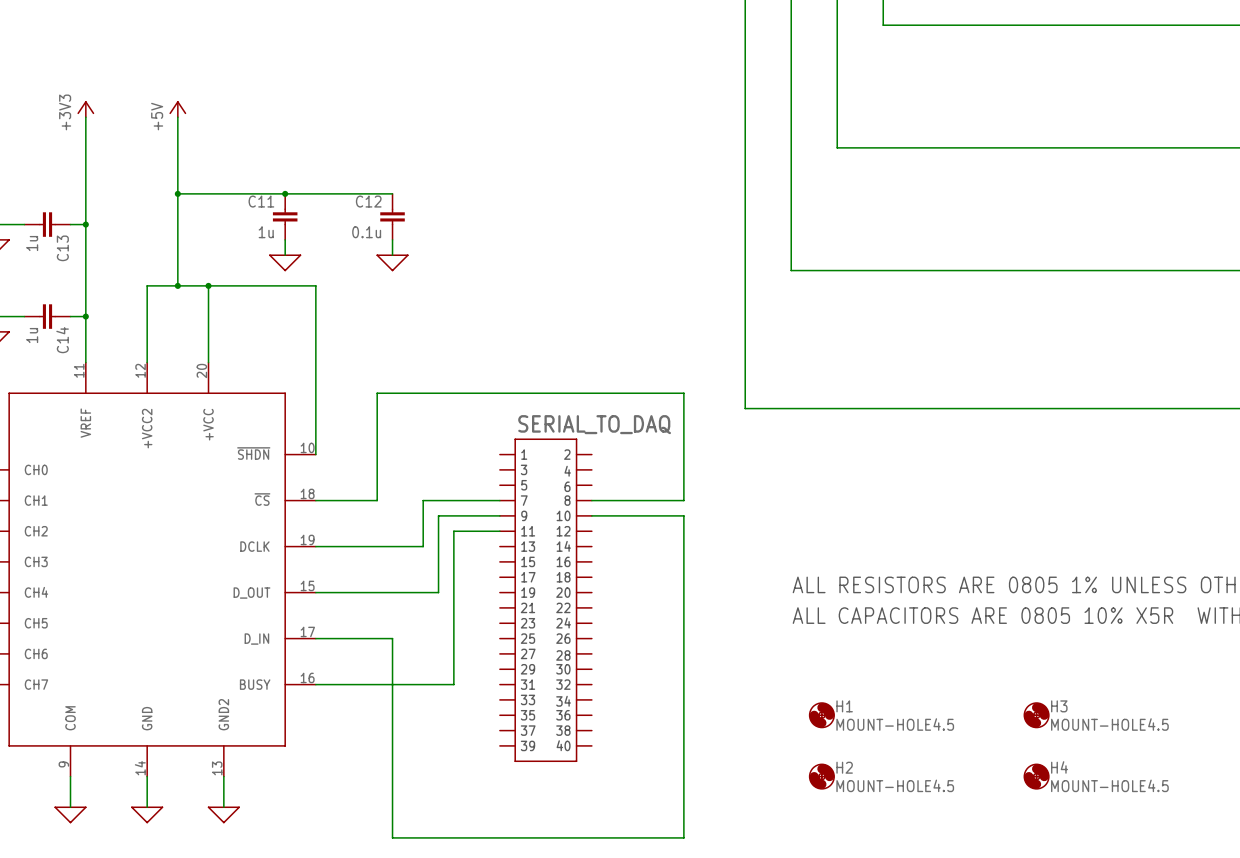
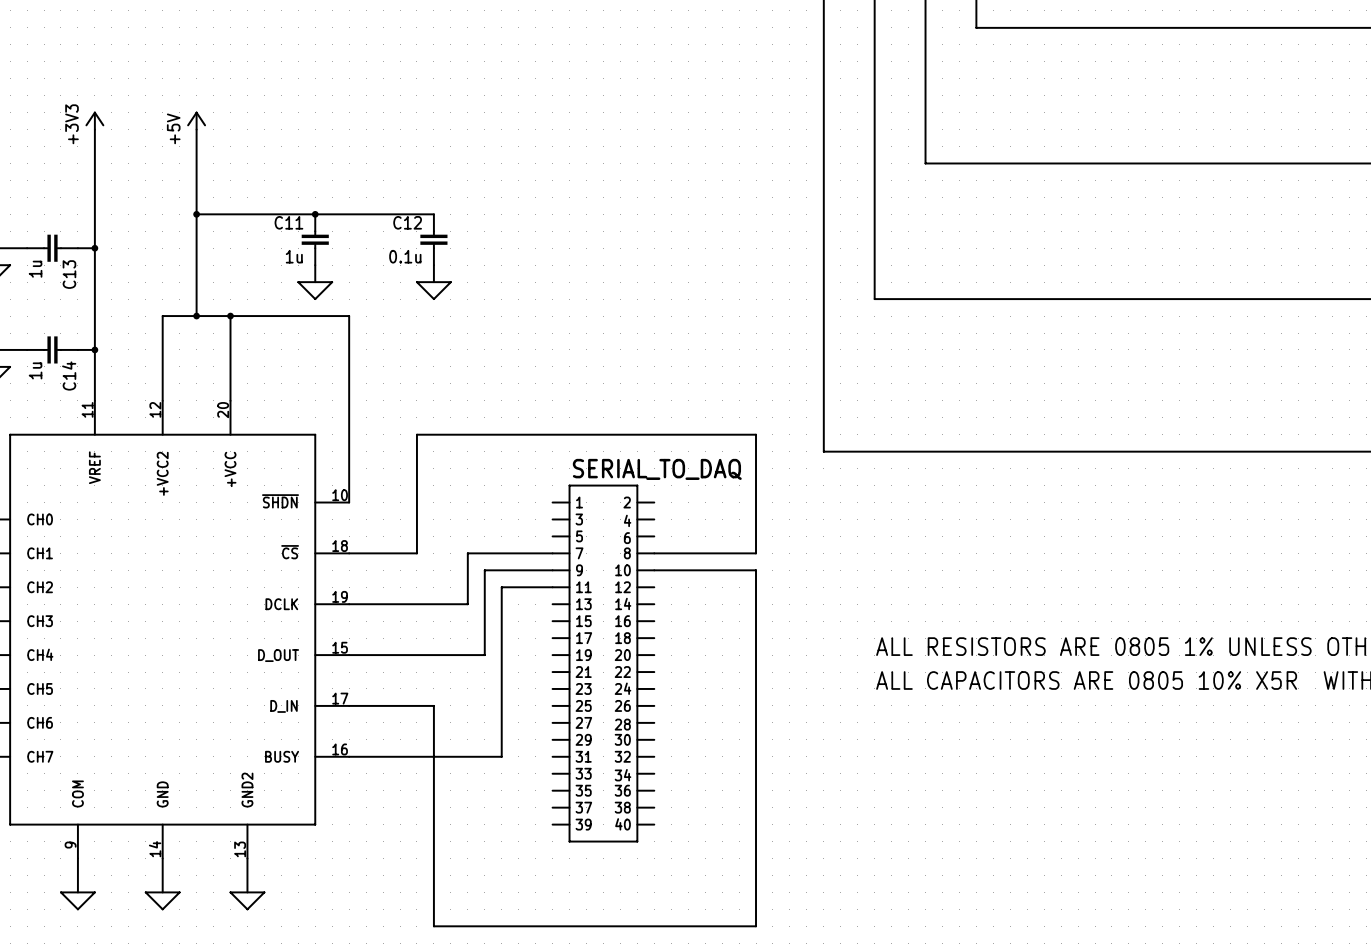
H1: MOUNT-HOLE4.5 (821, 715) -> none
H3: MOUNT-HOLE4.5 (1036, 715) -> none
H2: MOUNT-HOLE4.5 (821, 776) -> none
H4: MOUNT-HOLE4.5 (1036, 776) -> none

